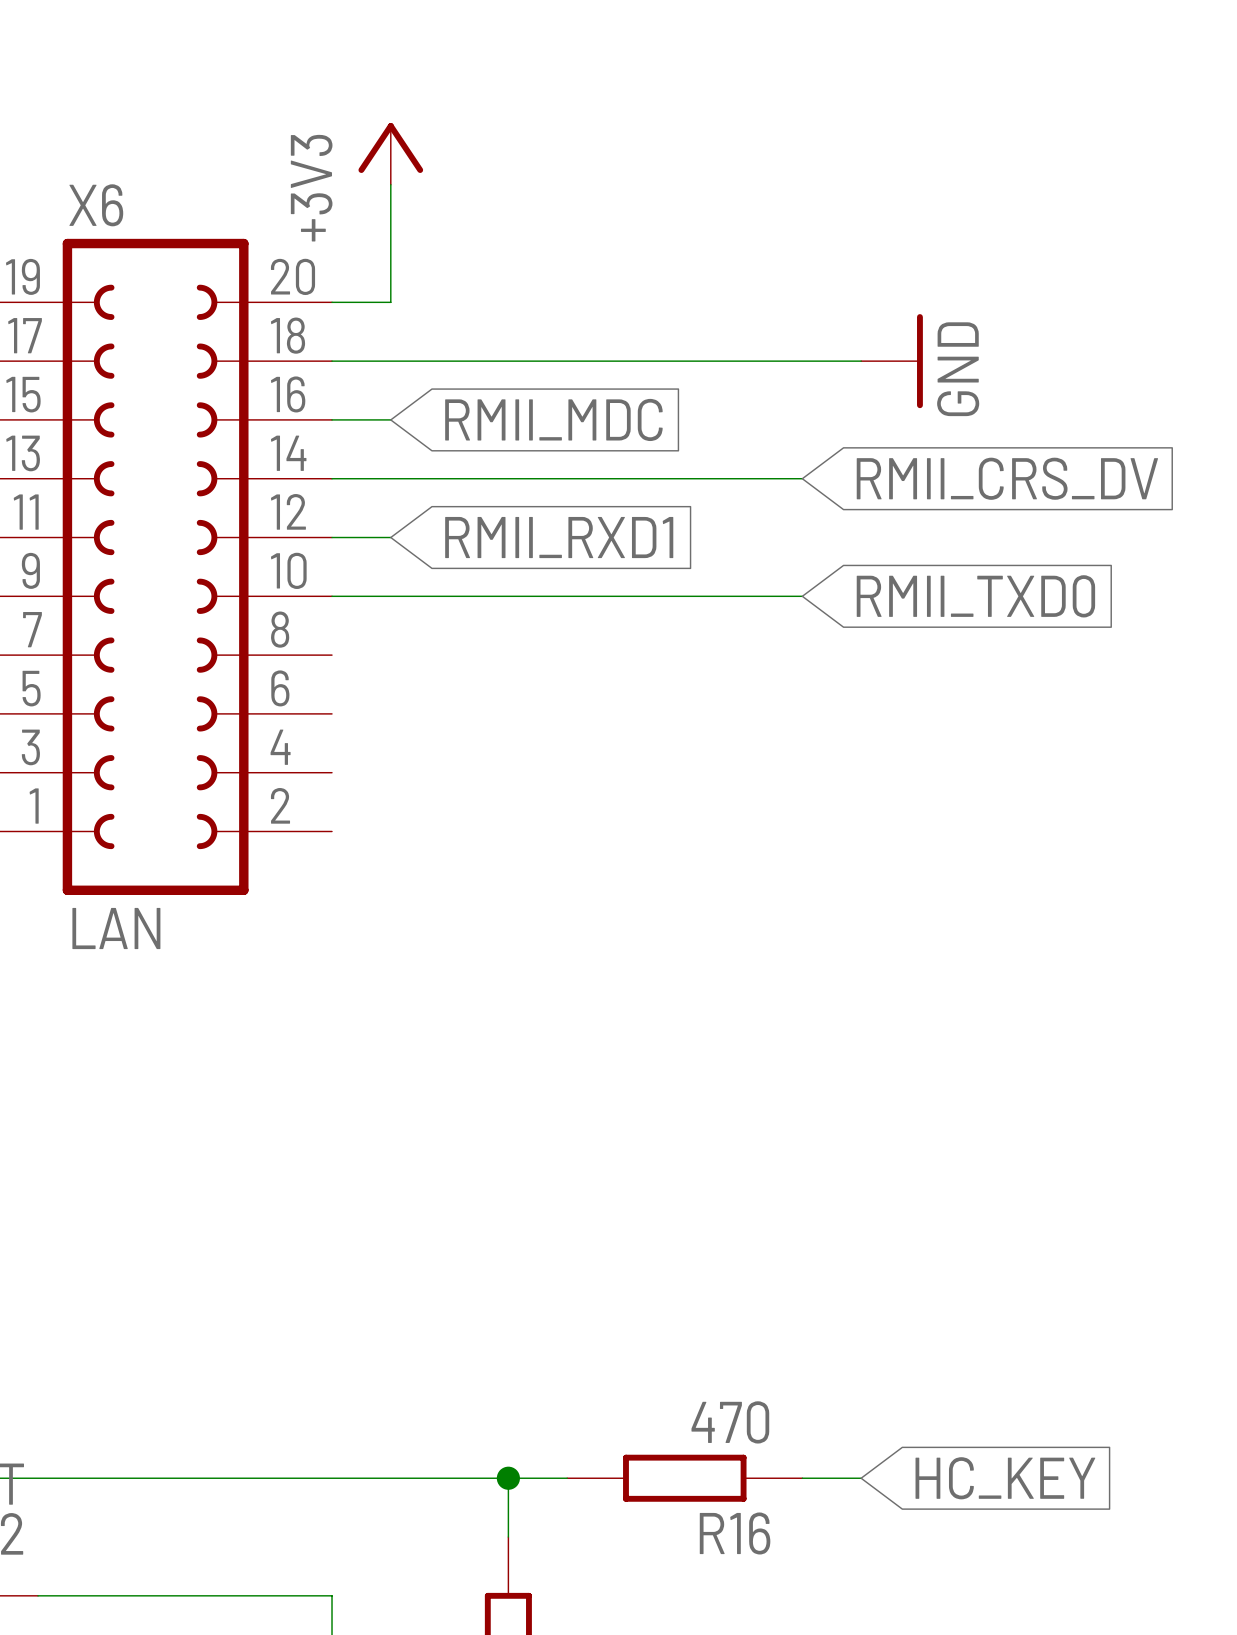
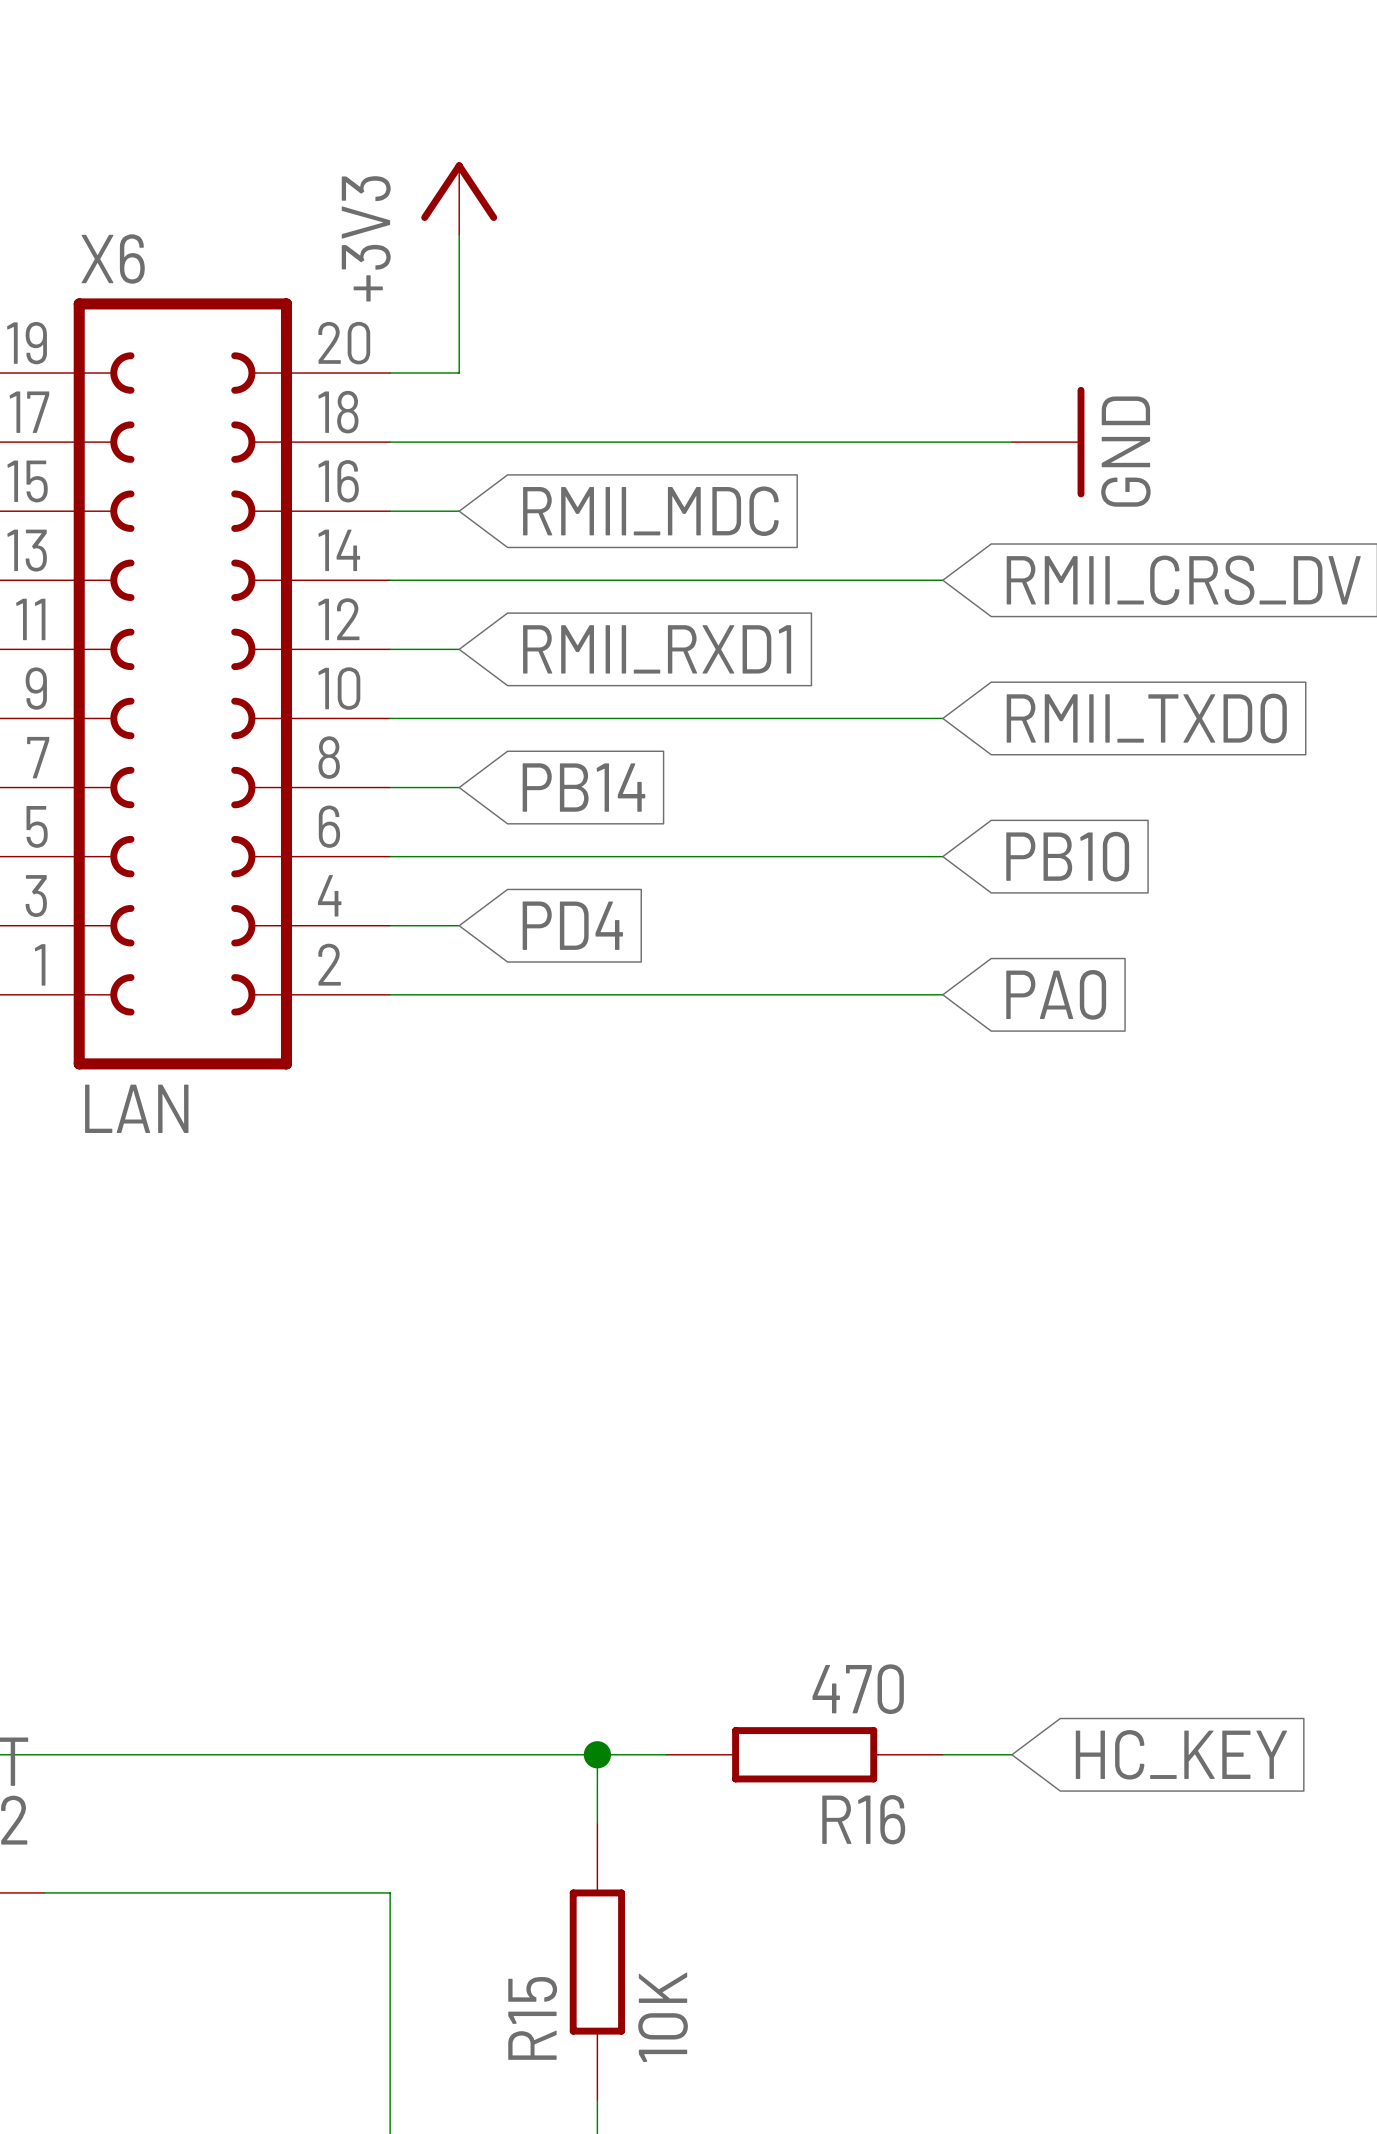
wire: none -> (390, 787) (459, 787)
global label: none -> PB14 (583, 787)
wire: none -> (390, 856) (942, 856)
global label: none -> PB10 (1067, 856)
wire: none -> (390, 925) (459, 925)
global label: none -> PD4 (572, 925)
wire: none -> (390, 994) (942, 994)
global label: none -> PA0 (1056, 994)

